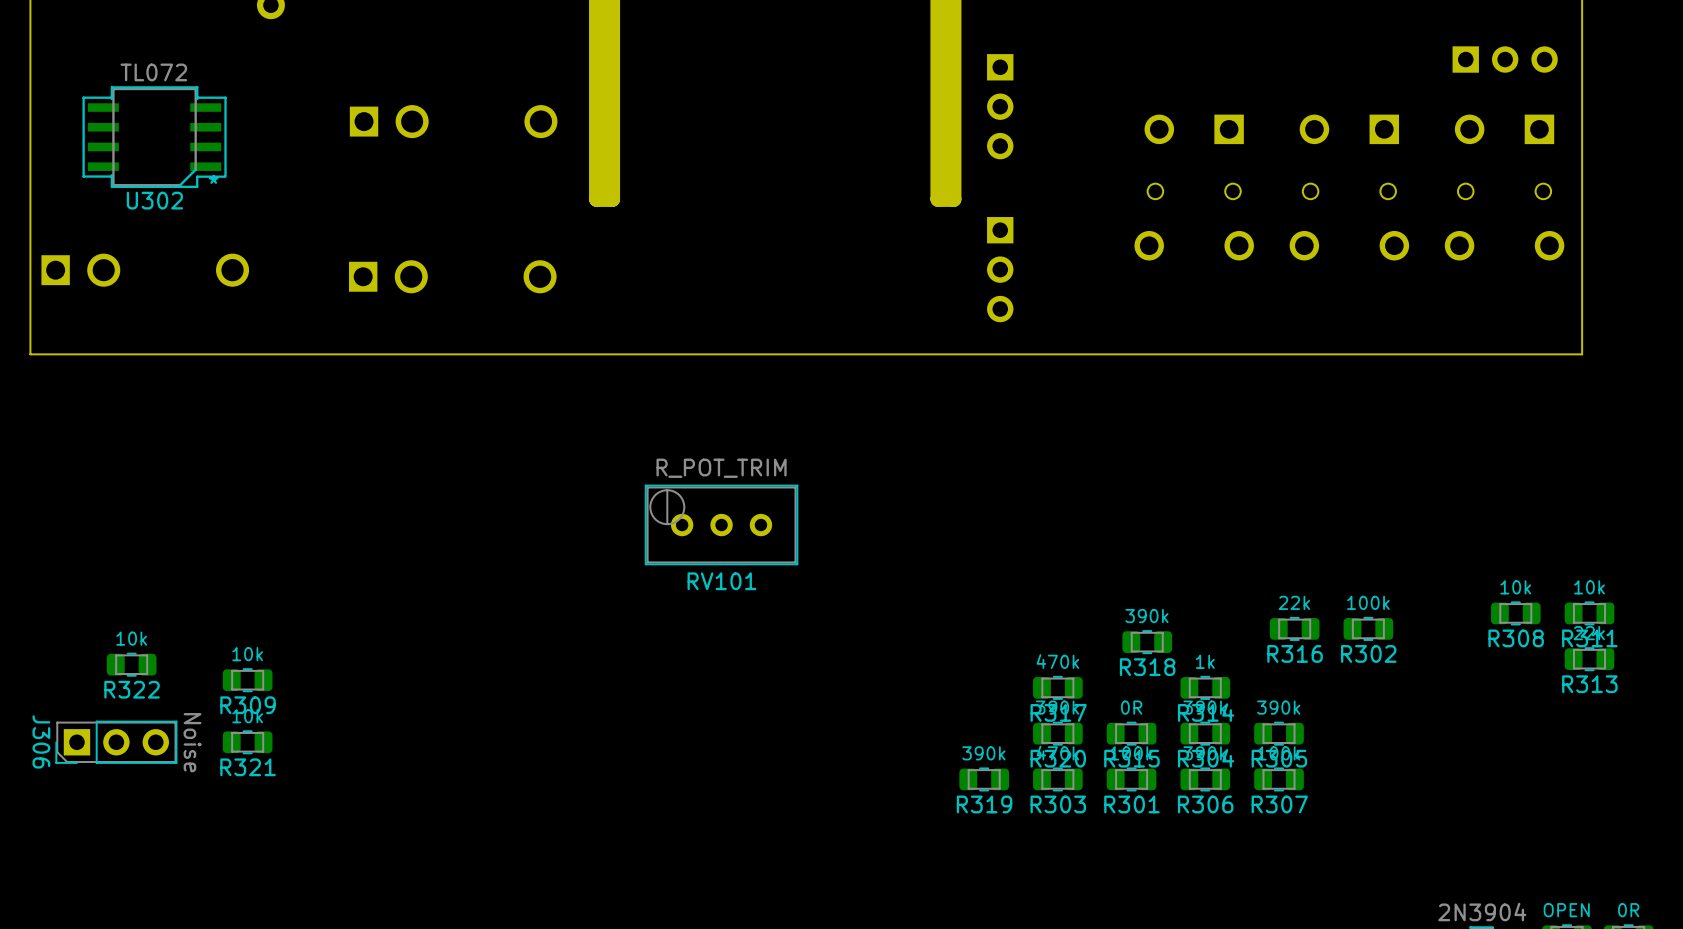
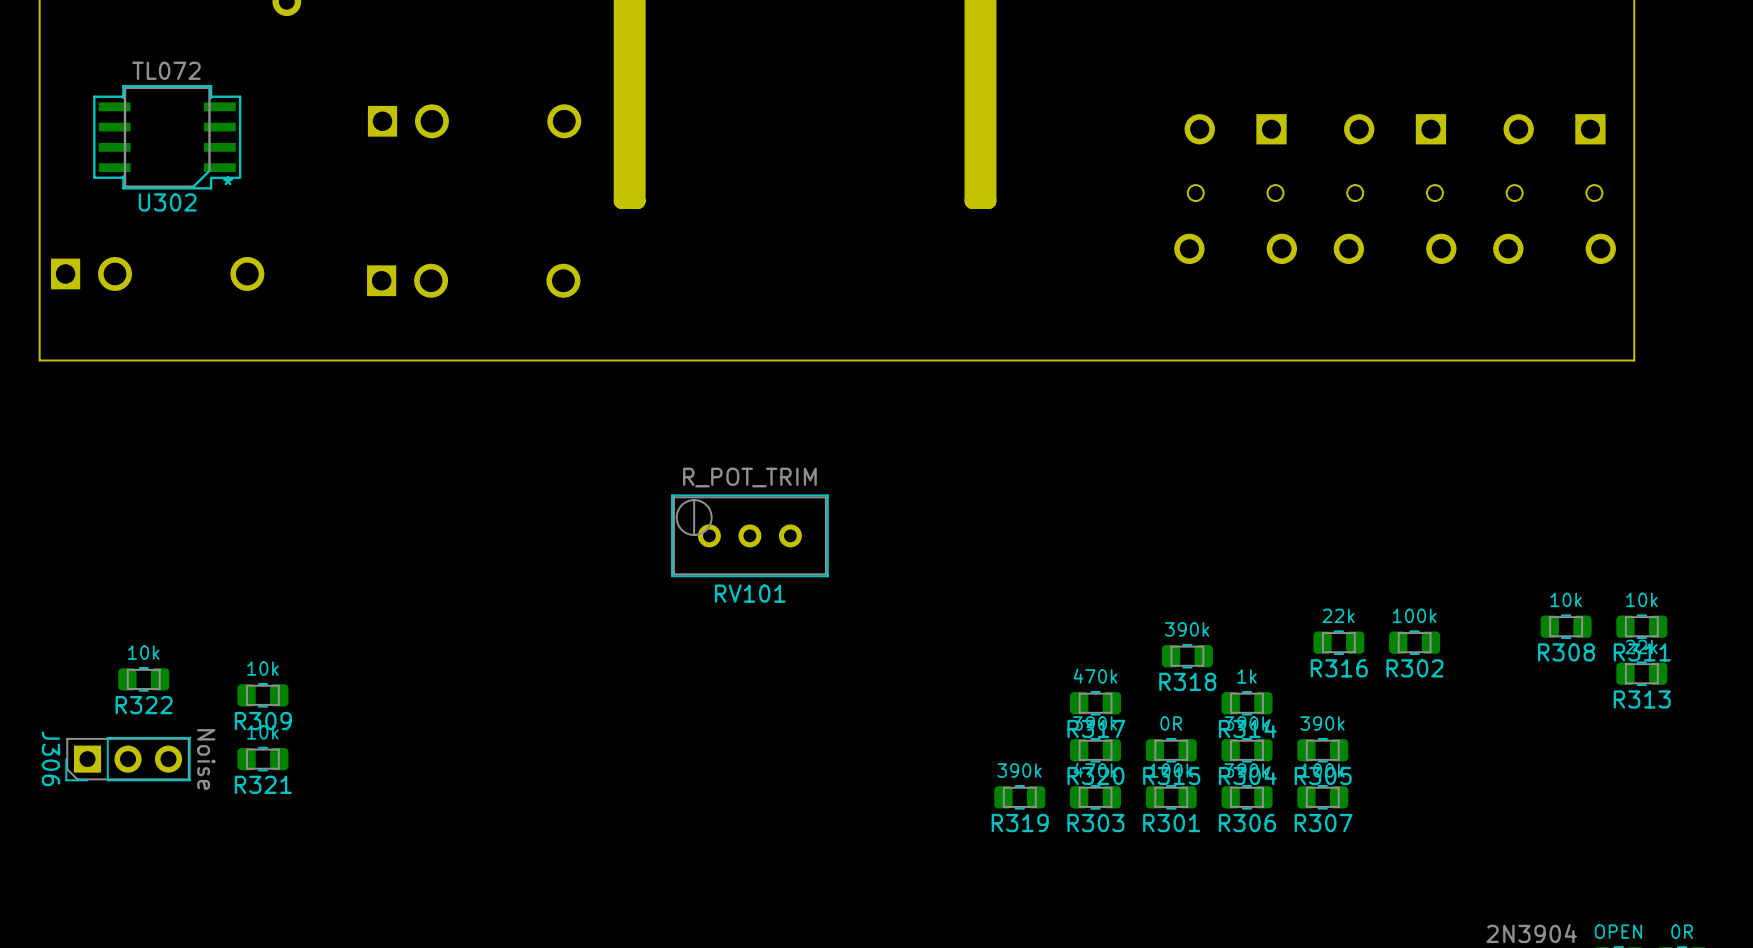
part: (1505, 59) -> none
part: (1000, 106) -> none
part: (1000, 269) -> none

